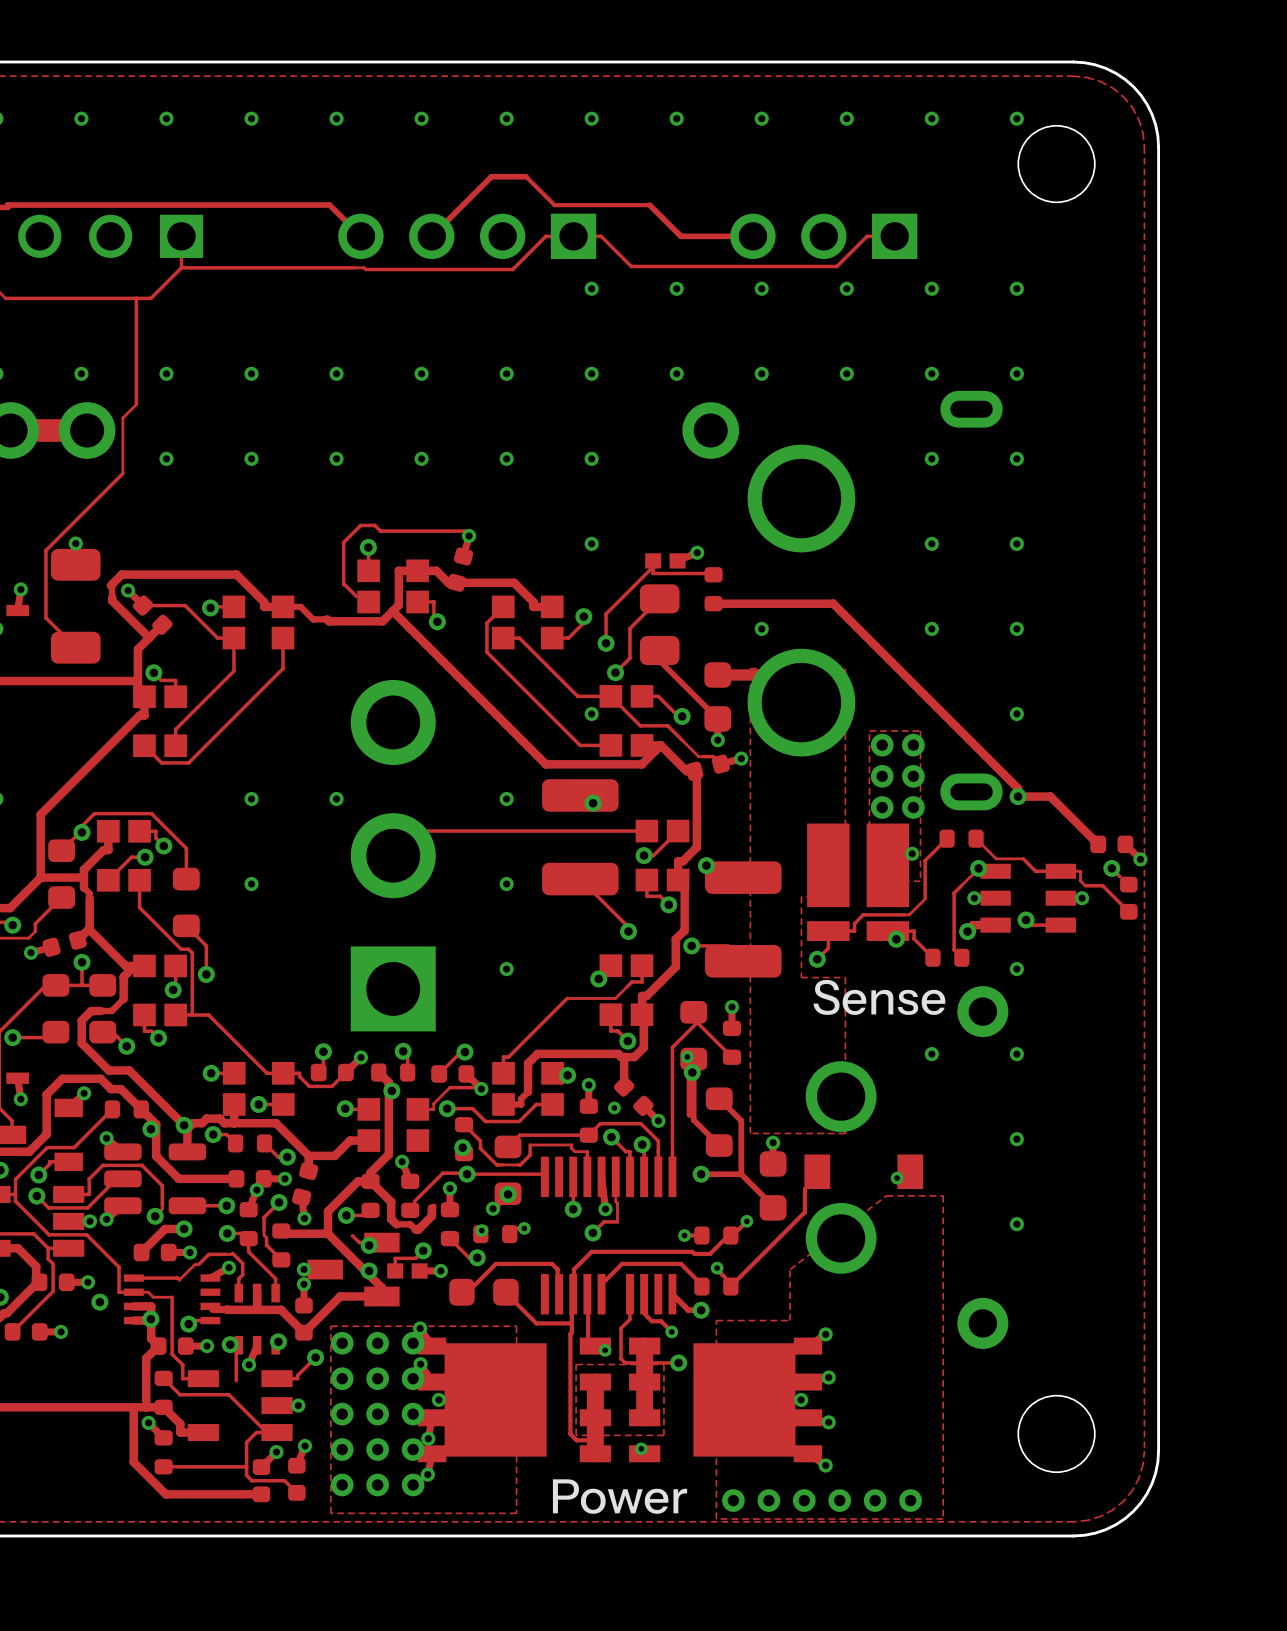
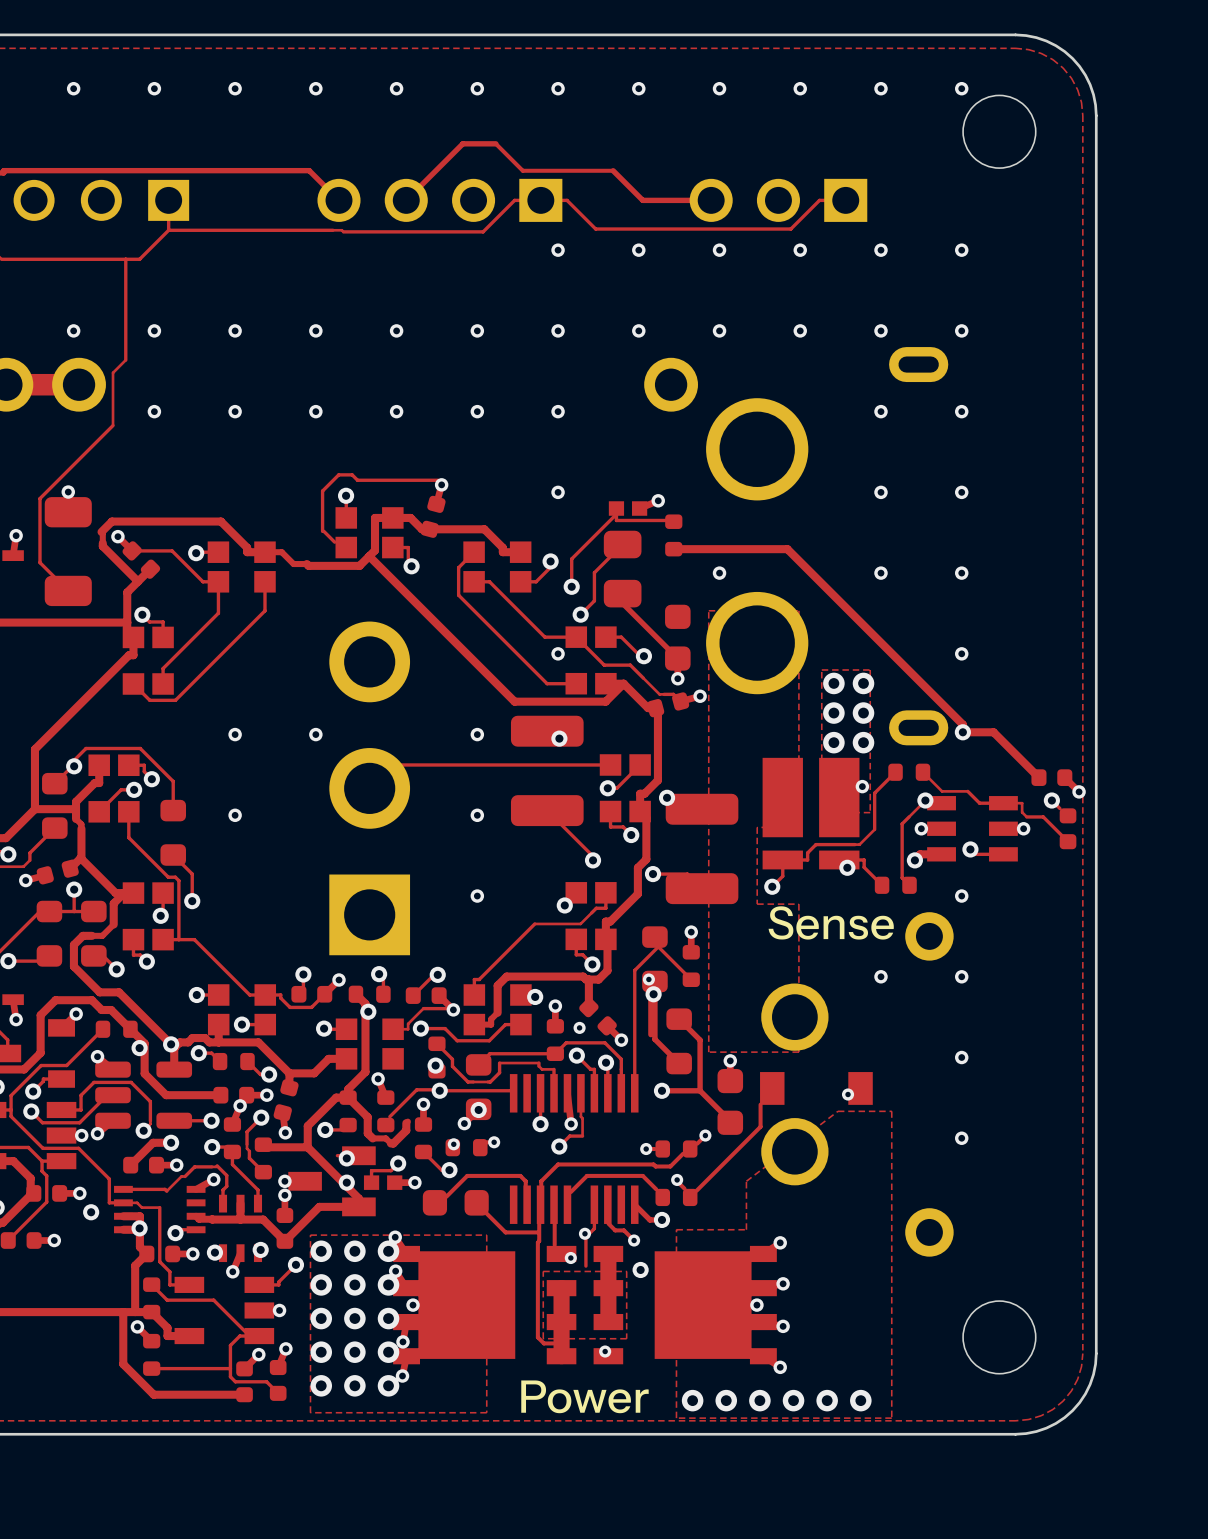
track: (717, 674) (758, 674) -> none
track: (352, 1235) (359, 1242) -> none
via: none -> (584, 1233)
track: (236, 1347) (236, 1380) -> none
track: (621, 1358) (625, 1362) (678, 1362) -> none

